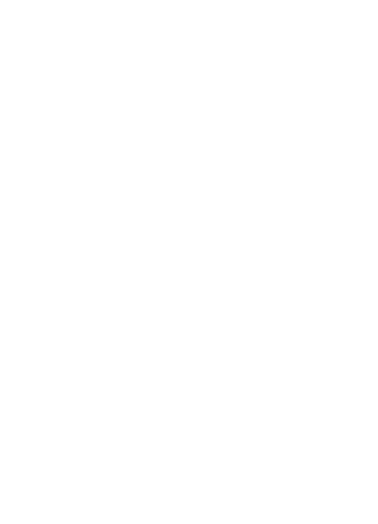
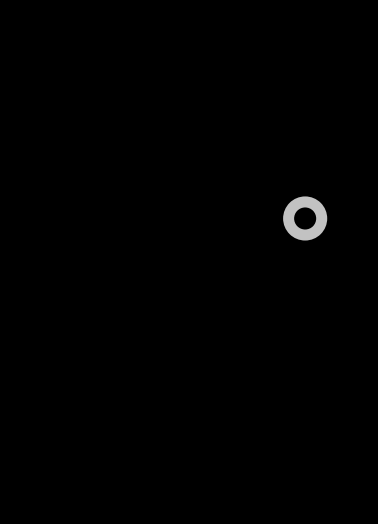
via: none -> (305, 218)

